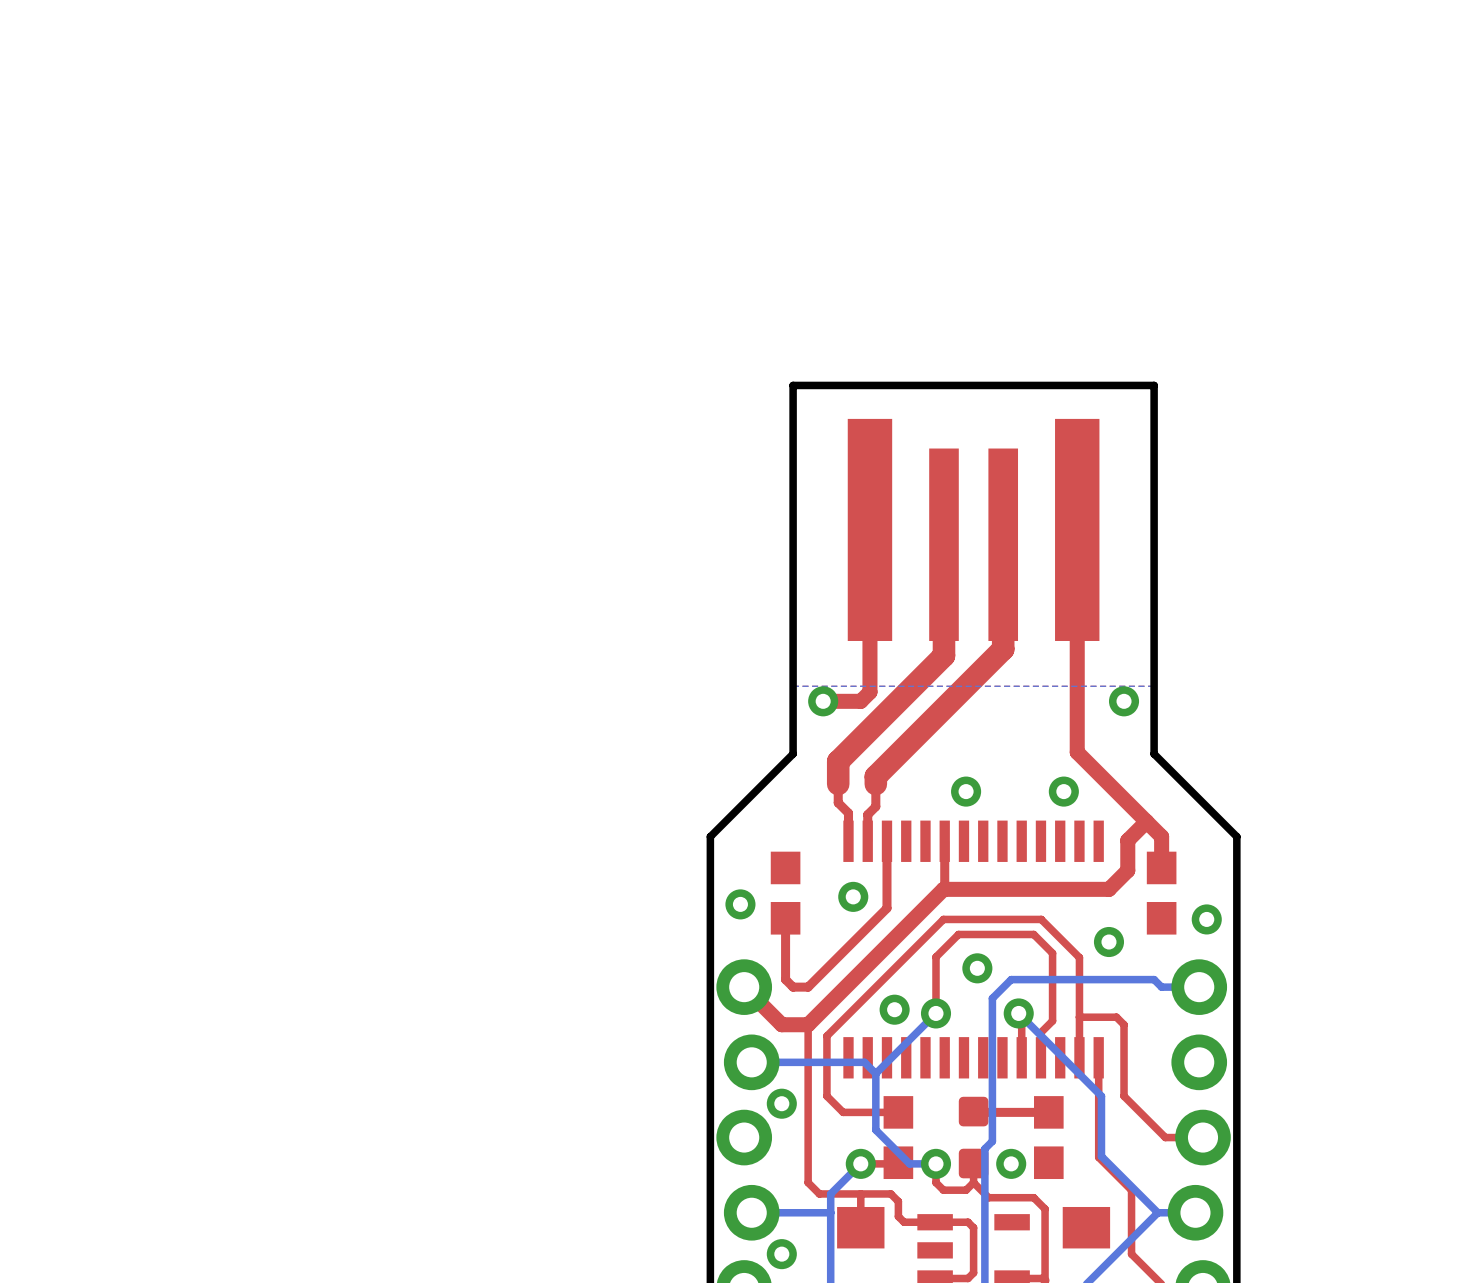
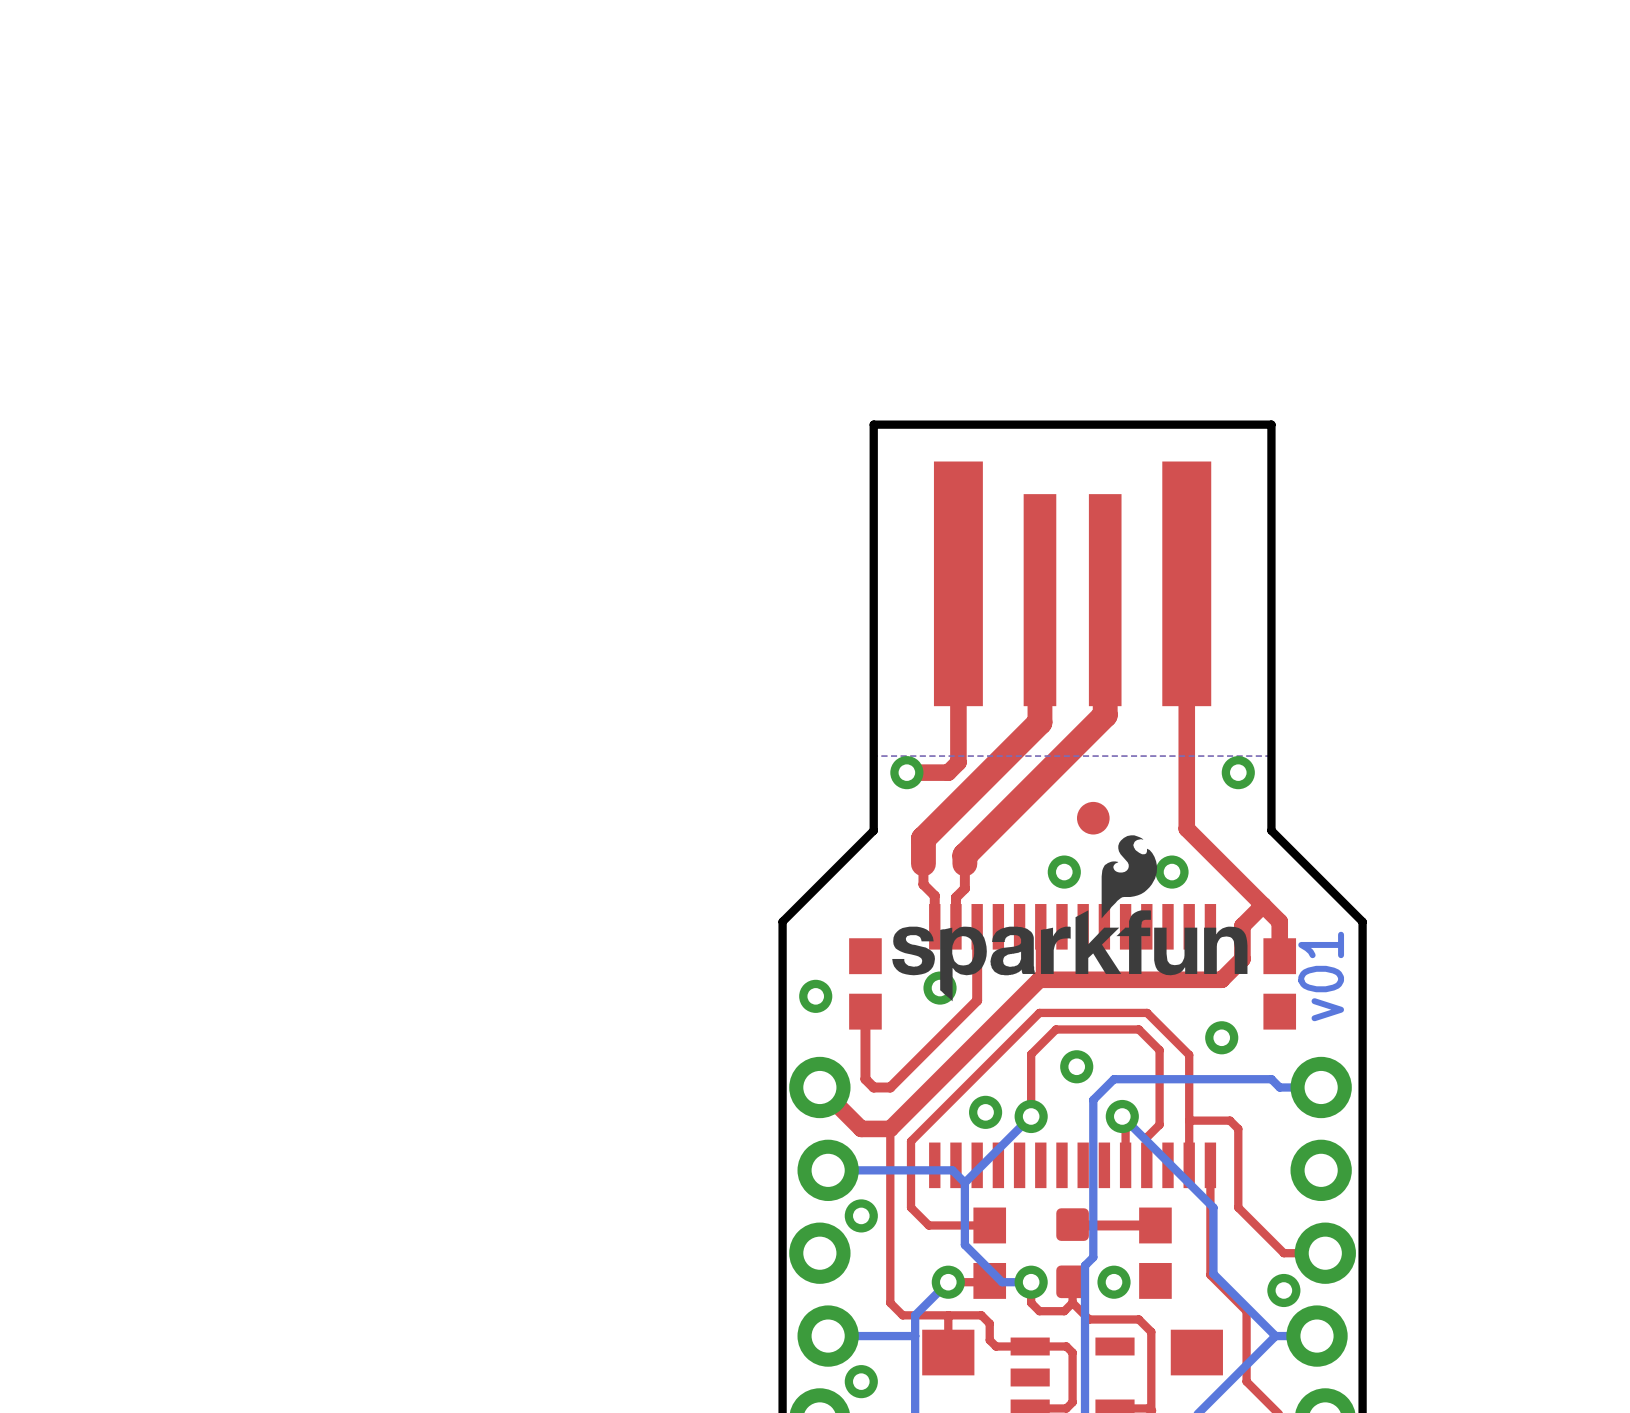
part: none -> (1093, 818)
drawing: none -> [892, 835, 1248, 1002]
text: none -> v01 (1321, 976)
via: (1206, 919) -> none
via: none -> (1283, 1290)

